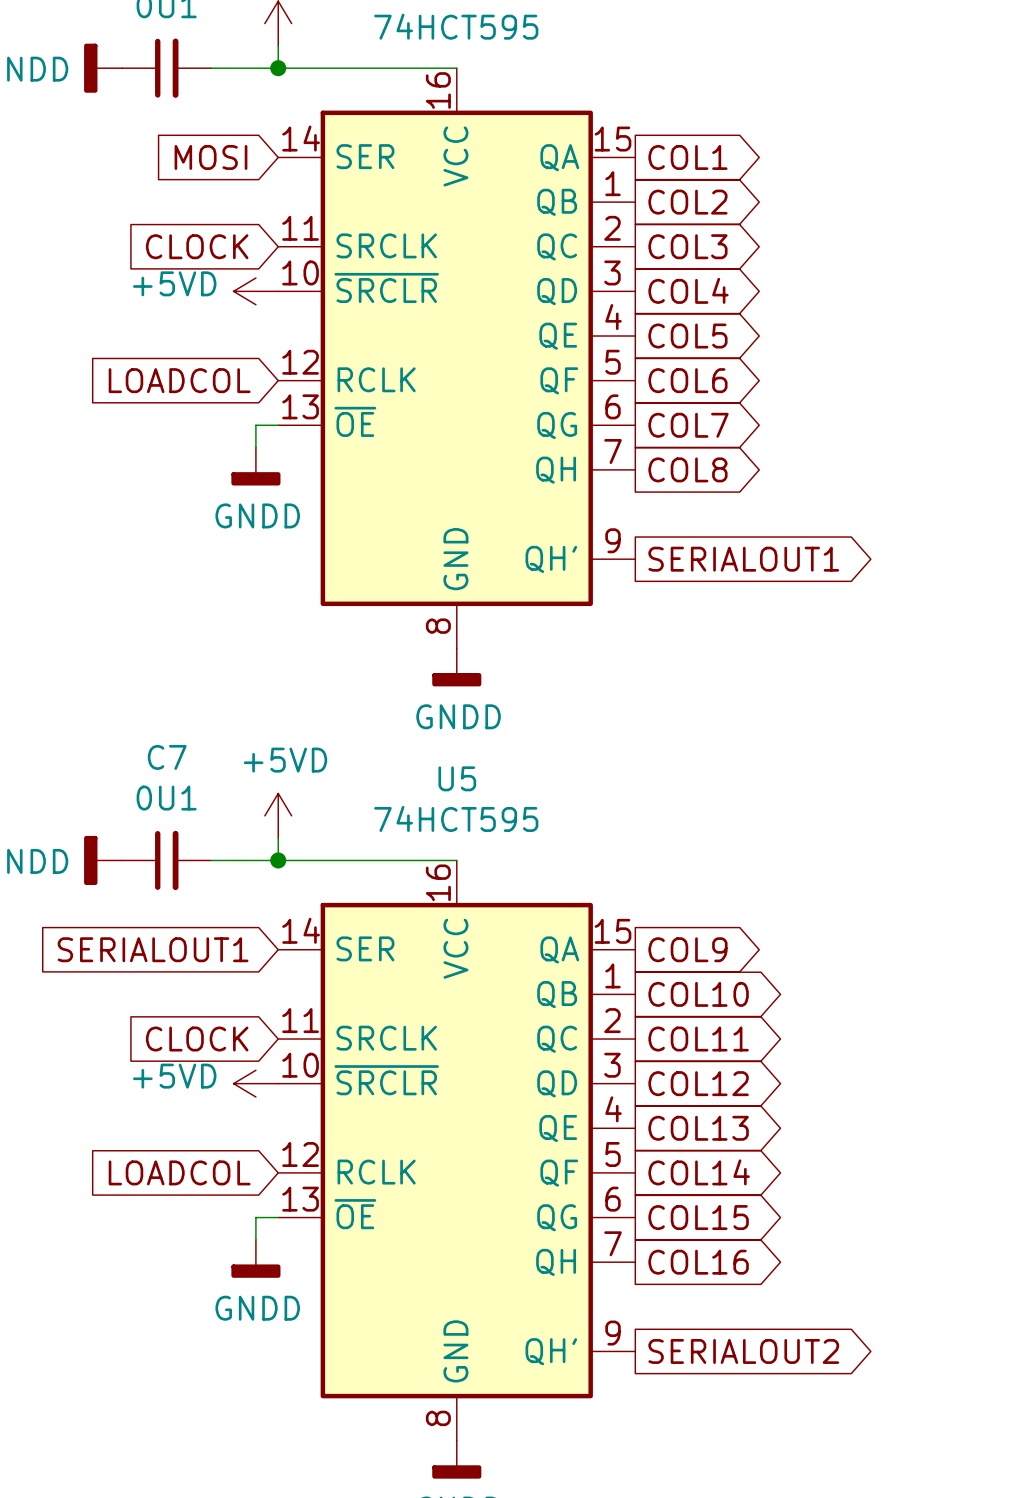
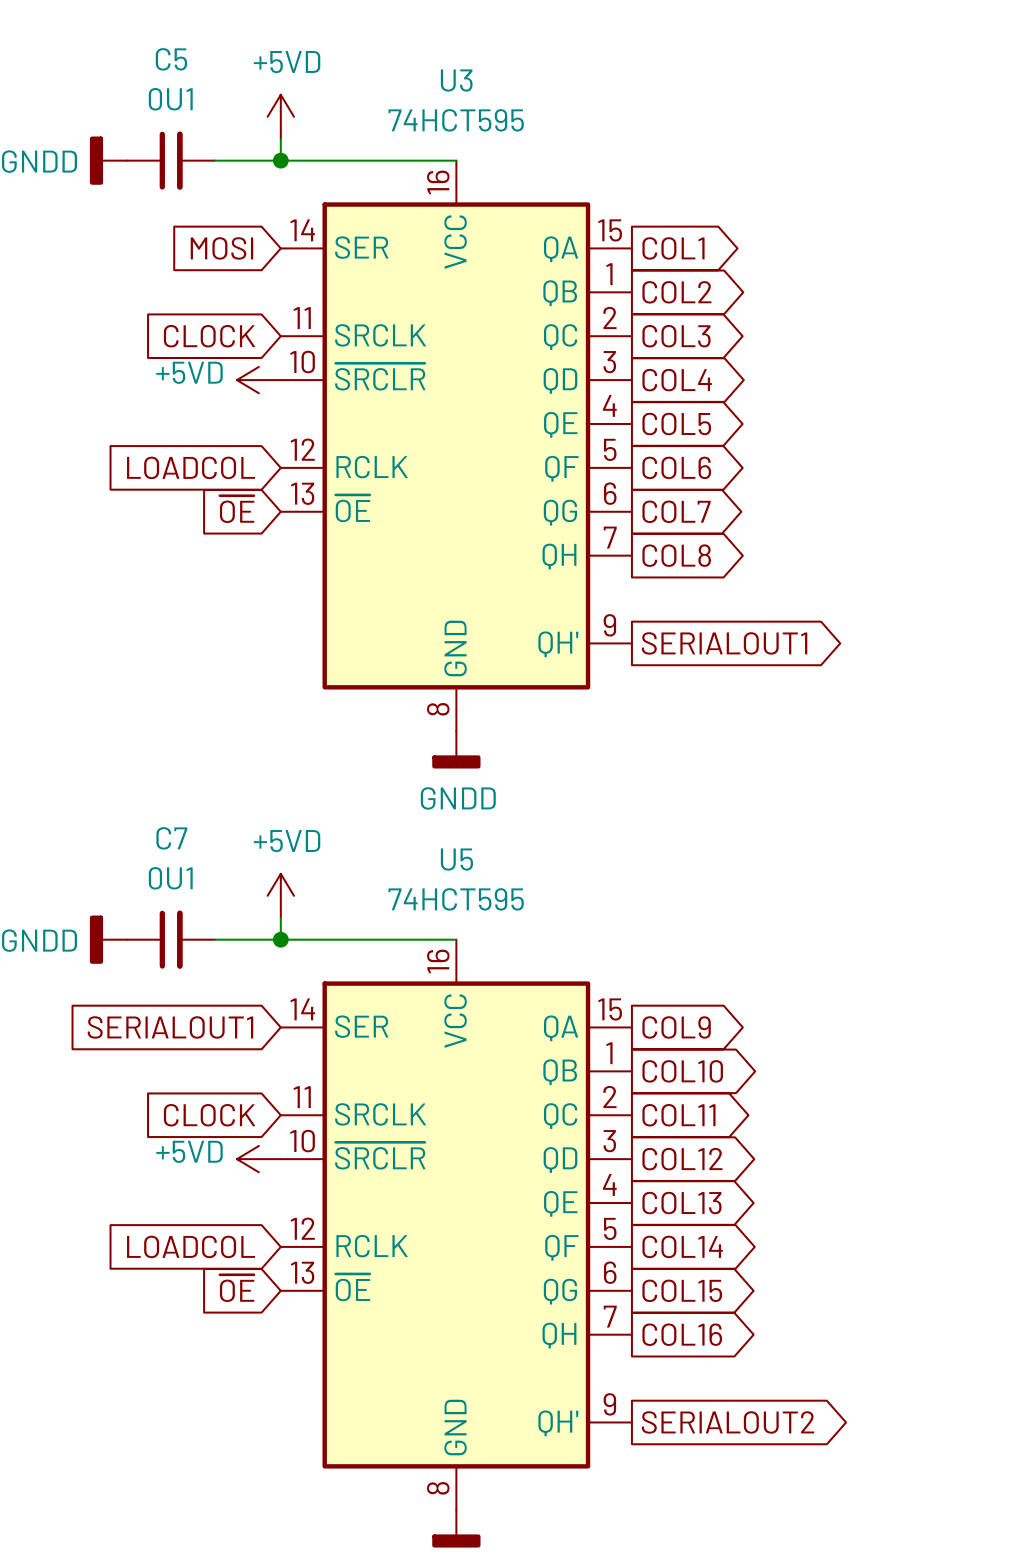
global label: none -> ~{OE} (237, 509)
wire: (278, 425) (255, 425) (255, 447) -> none
power symbol: GNDD (255, 466) -> none
global label: none -> ~{OE} (237, 1288)
wire: (278, 1217) (255, 1217) (255, 1239) -> none
power symbol: GNDD (255, 1258) -> none

